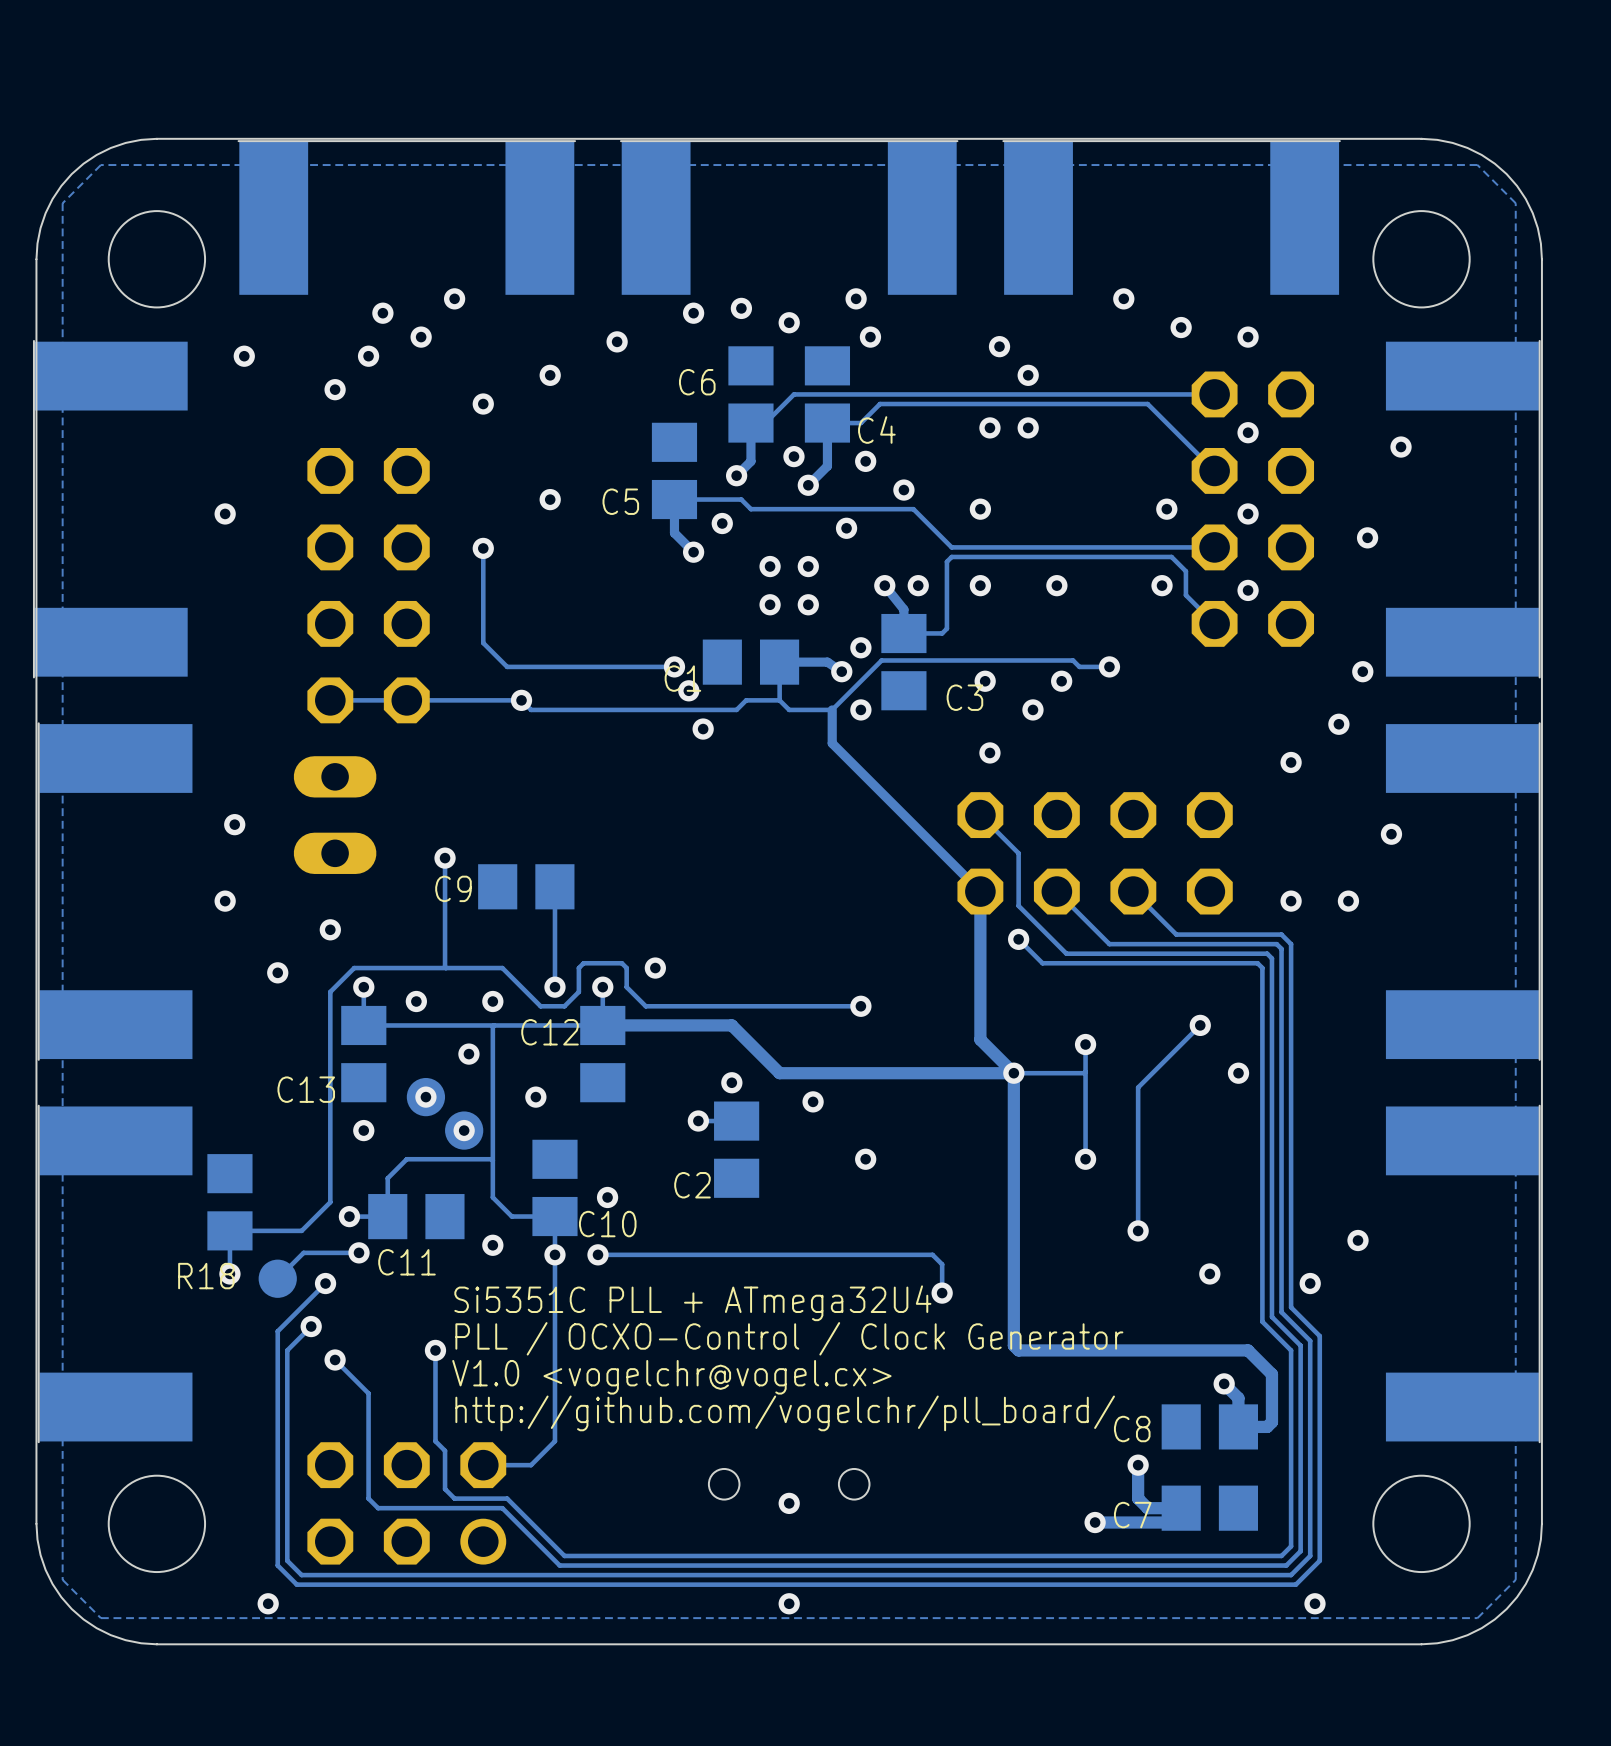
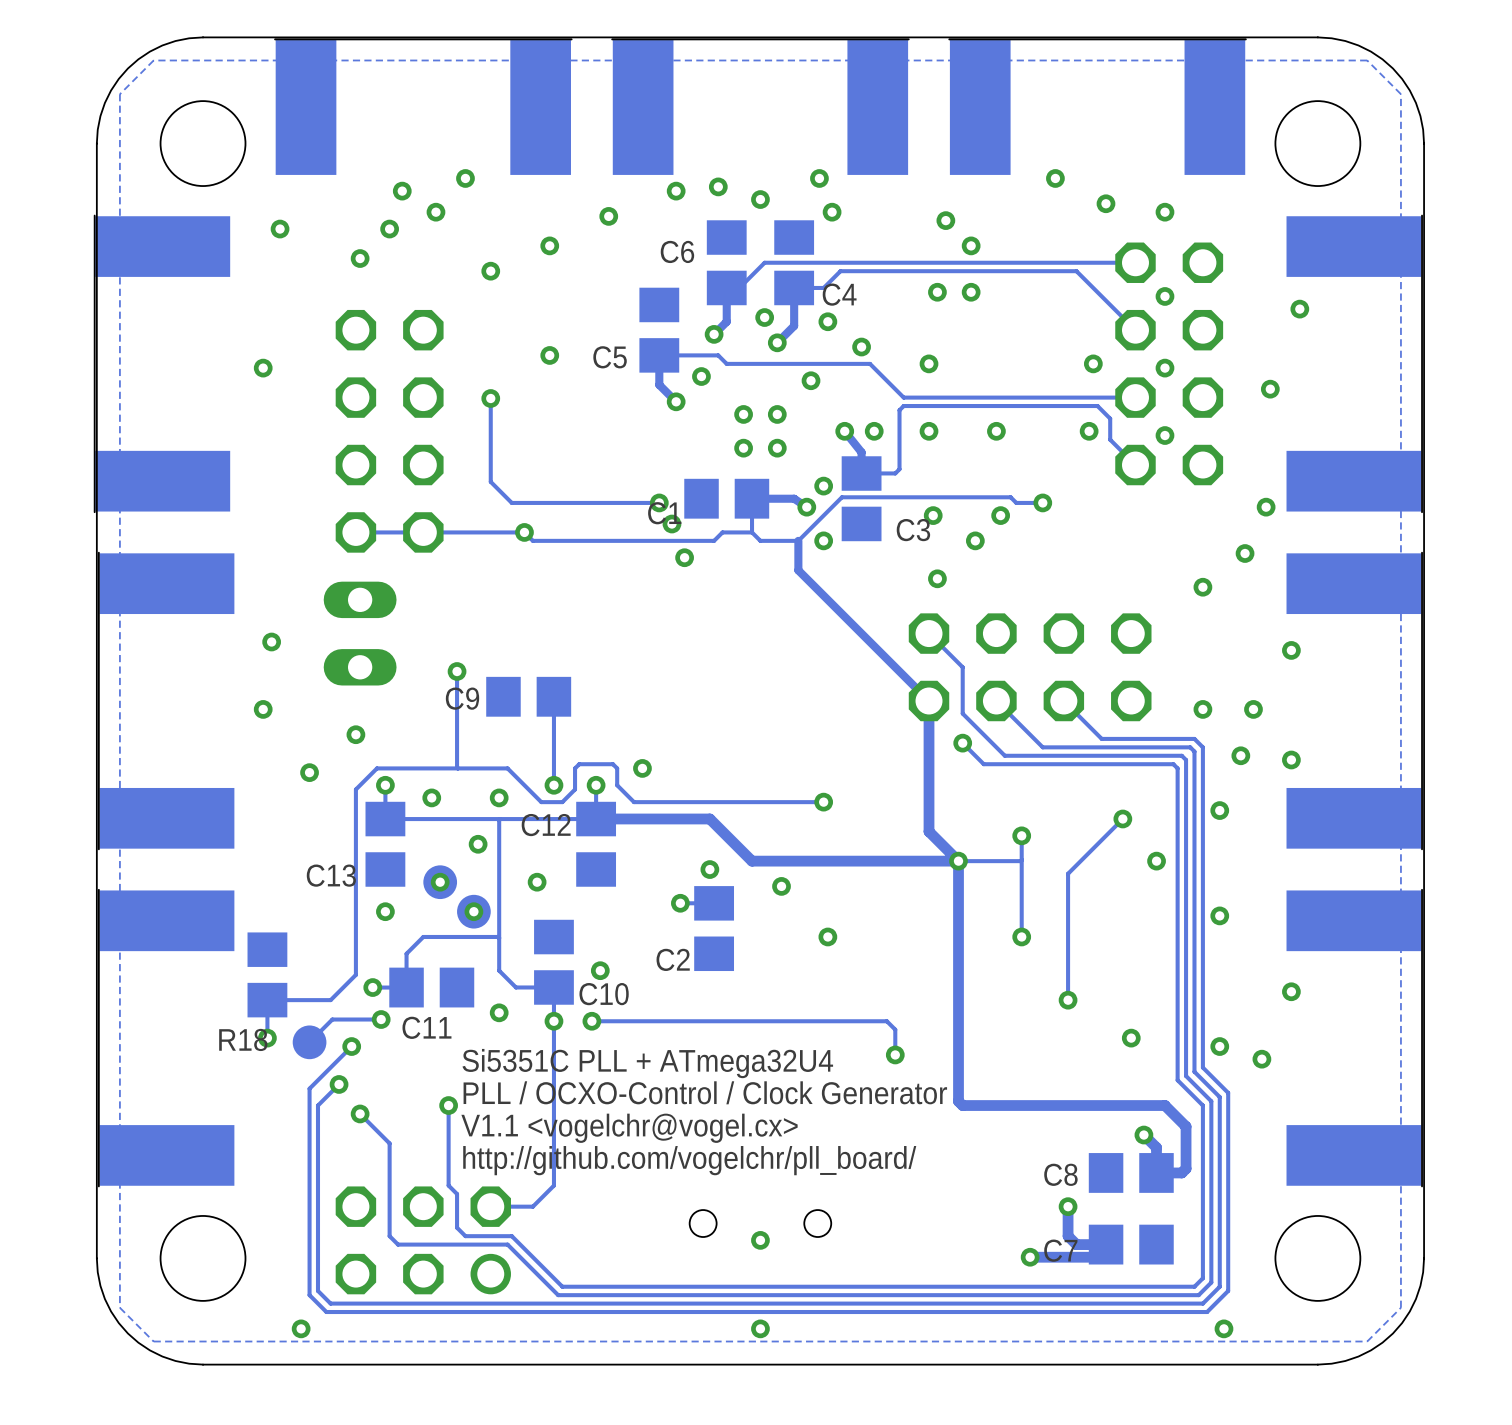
via: none -> (1240, 755)
via: none -> (1291, 759)
via: none -> (1219, 810)
via: none -> (1219, 915)
via: none -> (1291, 991)
via: (1358, 1240) -> none
via: none -> (1261, 1059)
text: V1.0 <vogelchr@vogel.cx> (671, 1377) -> V1.1 <vogelchr@vogel.cx> (629, 1128)

